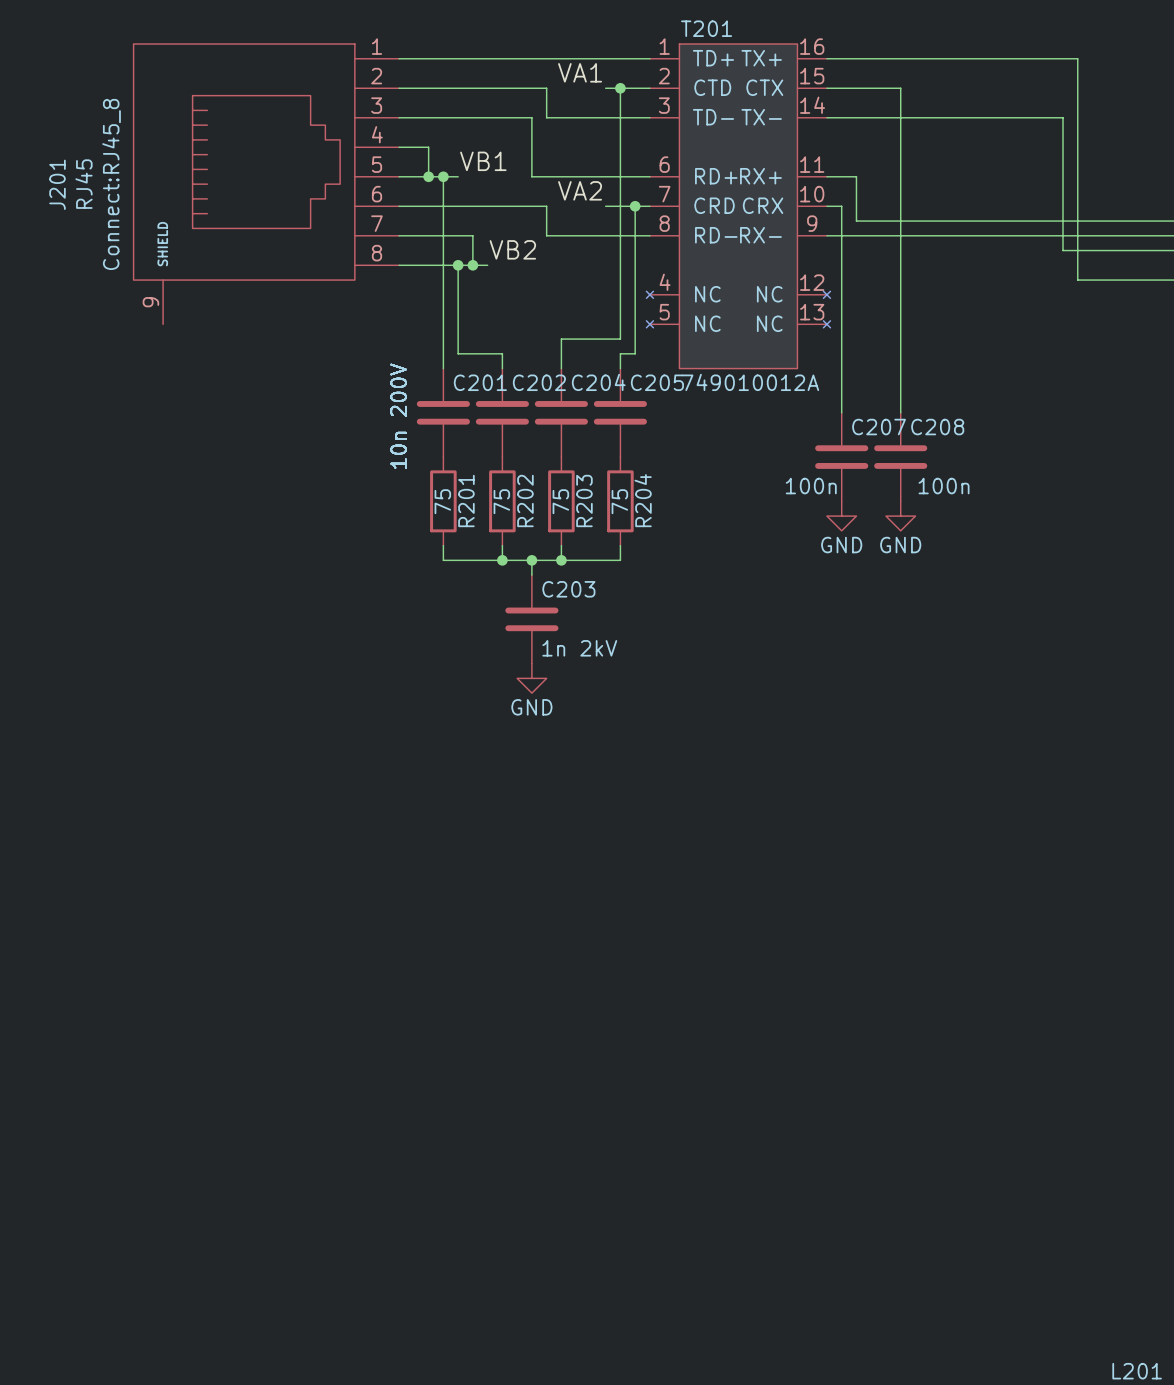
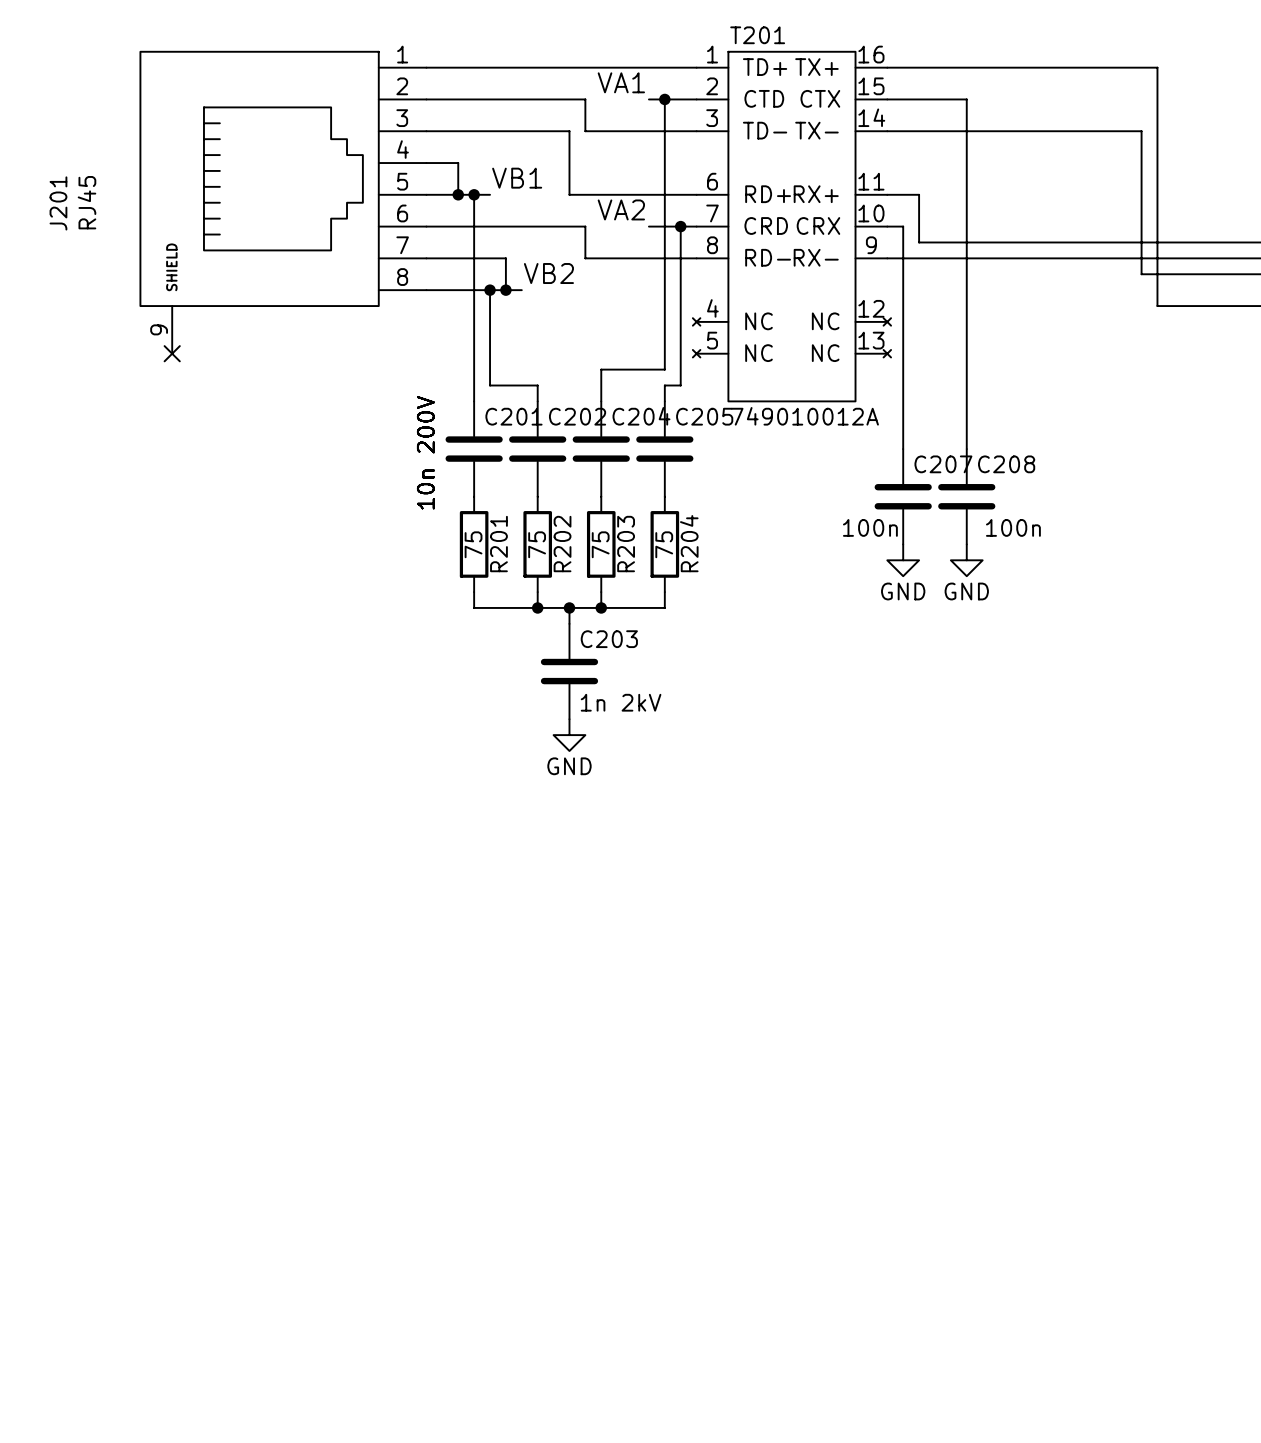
J201 text: Connect:RJ45_8 (111, 184) -> none
no-connect mark: none -> (172, 353)

